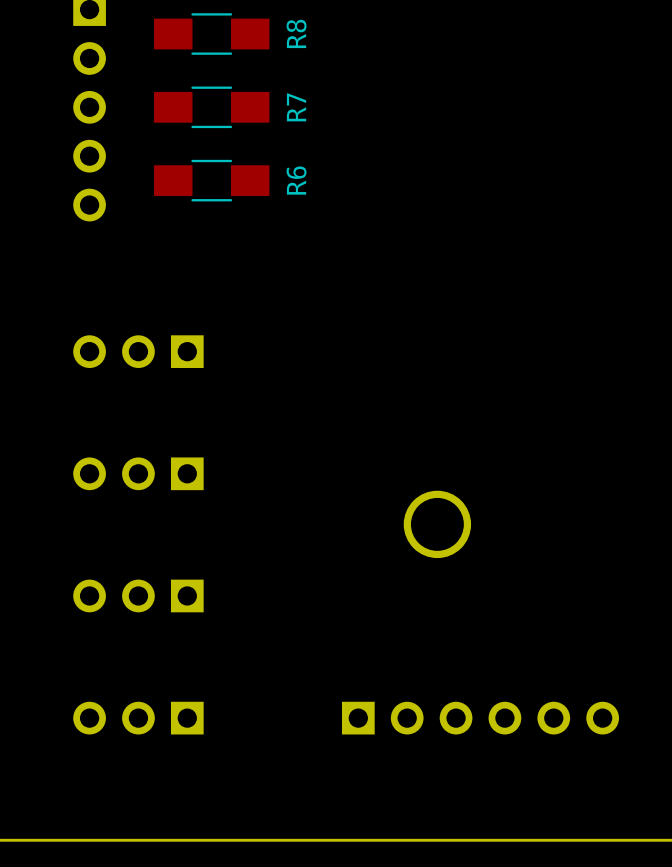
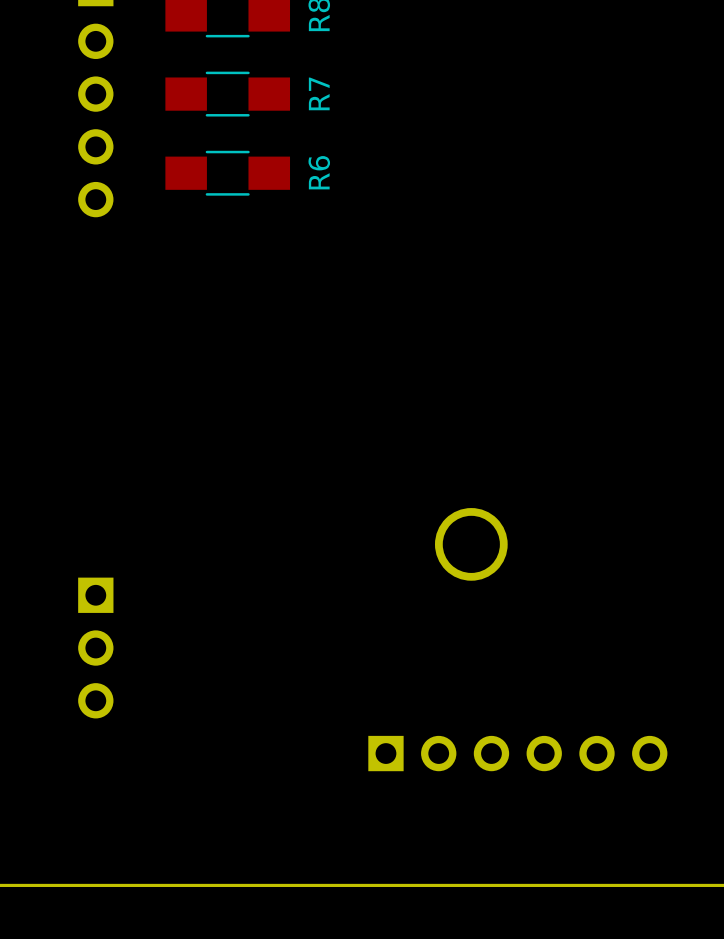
part: (138, 351) -> none
part: (138, 473) -> none
part: (138, 595) -> none
part: none -> (95, 648)
part: (138, 718) -> none

